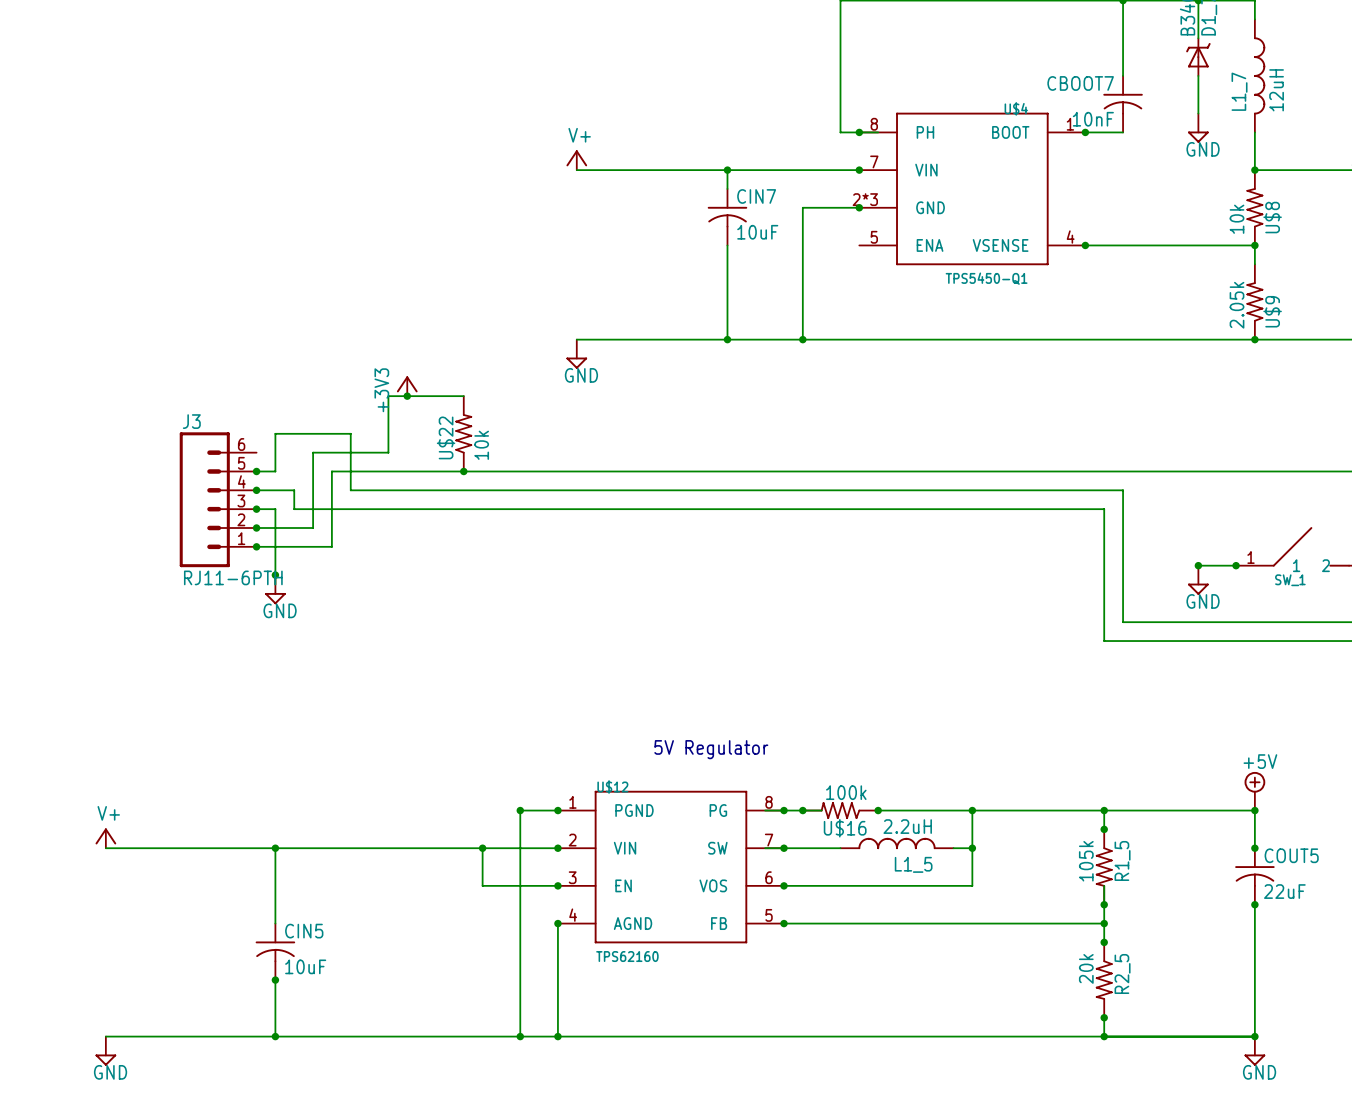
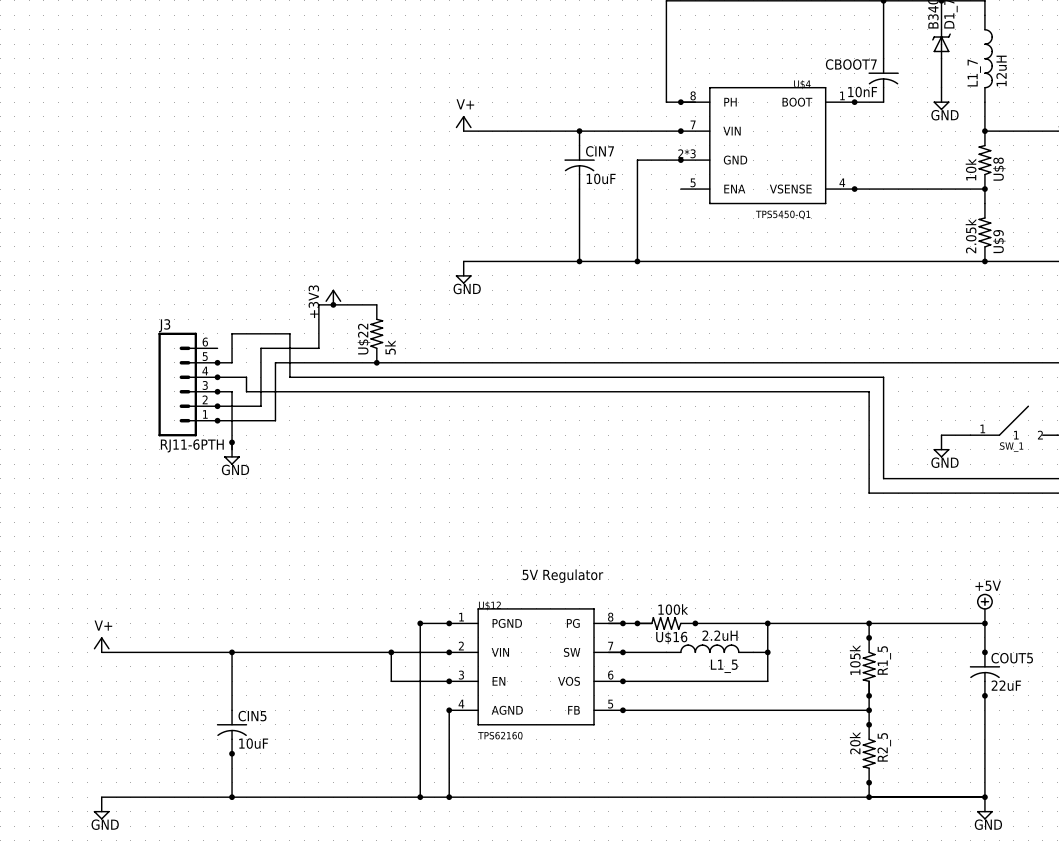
U$22 value: 10k (481, 445) -> 5k (390, 347)
junction: (1198, 565) -> none
junction: (1236, 565) -> none

